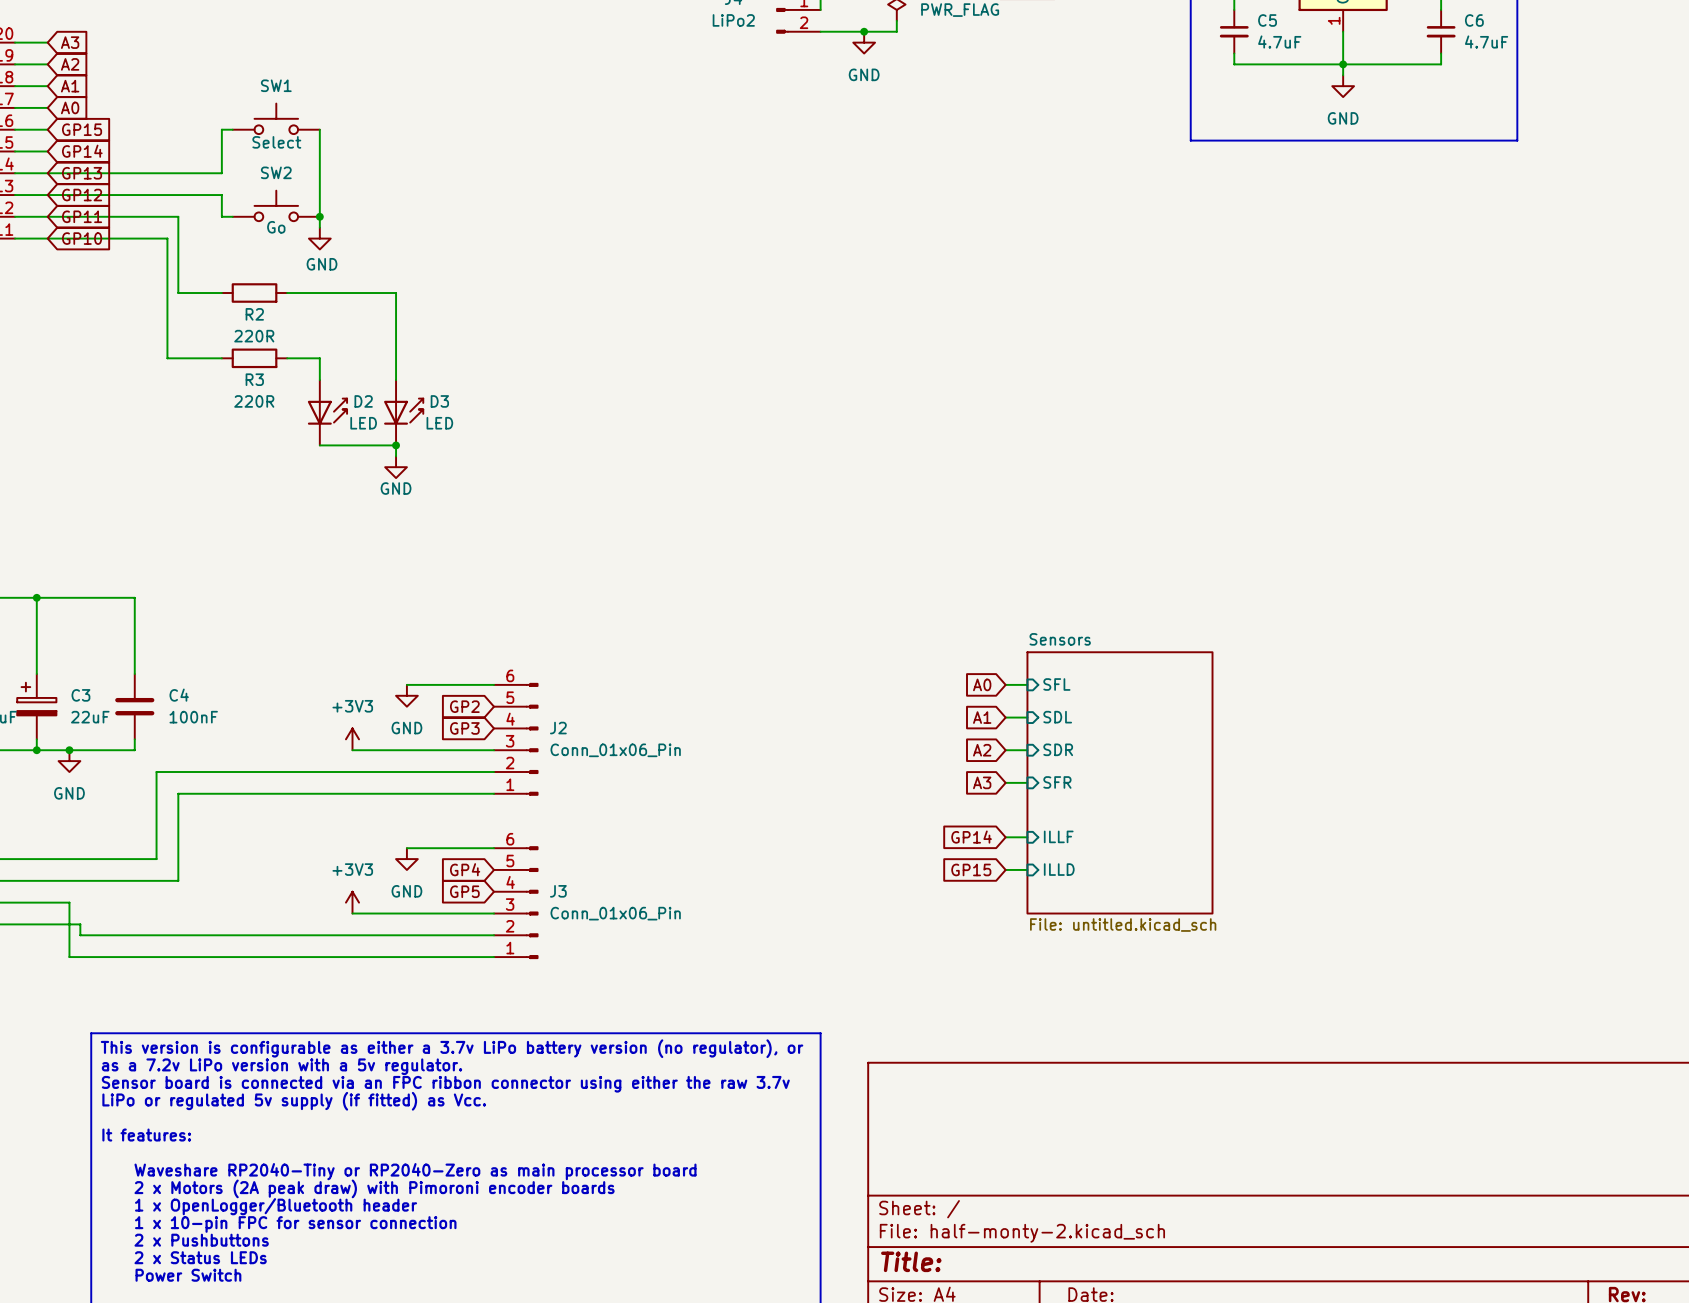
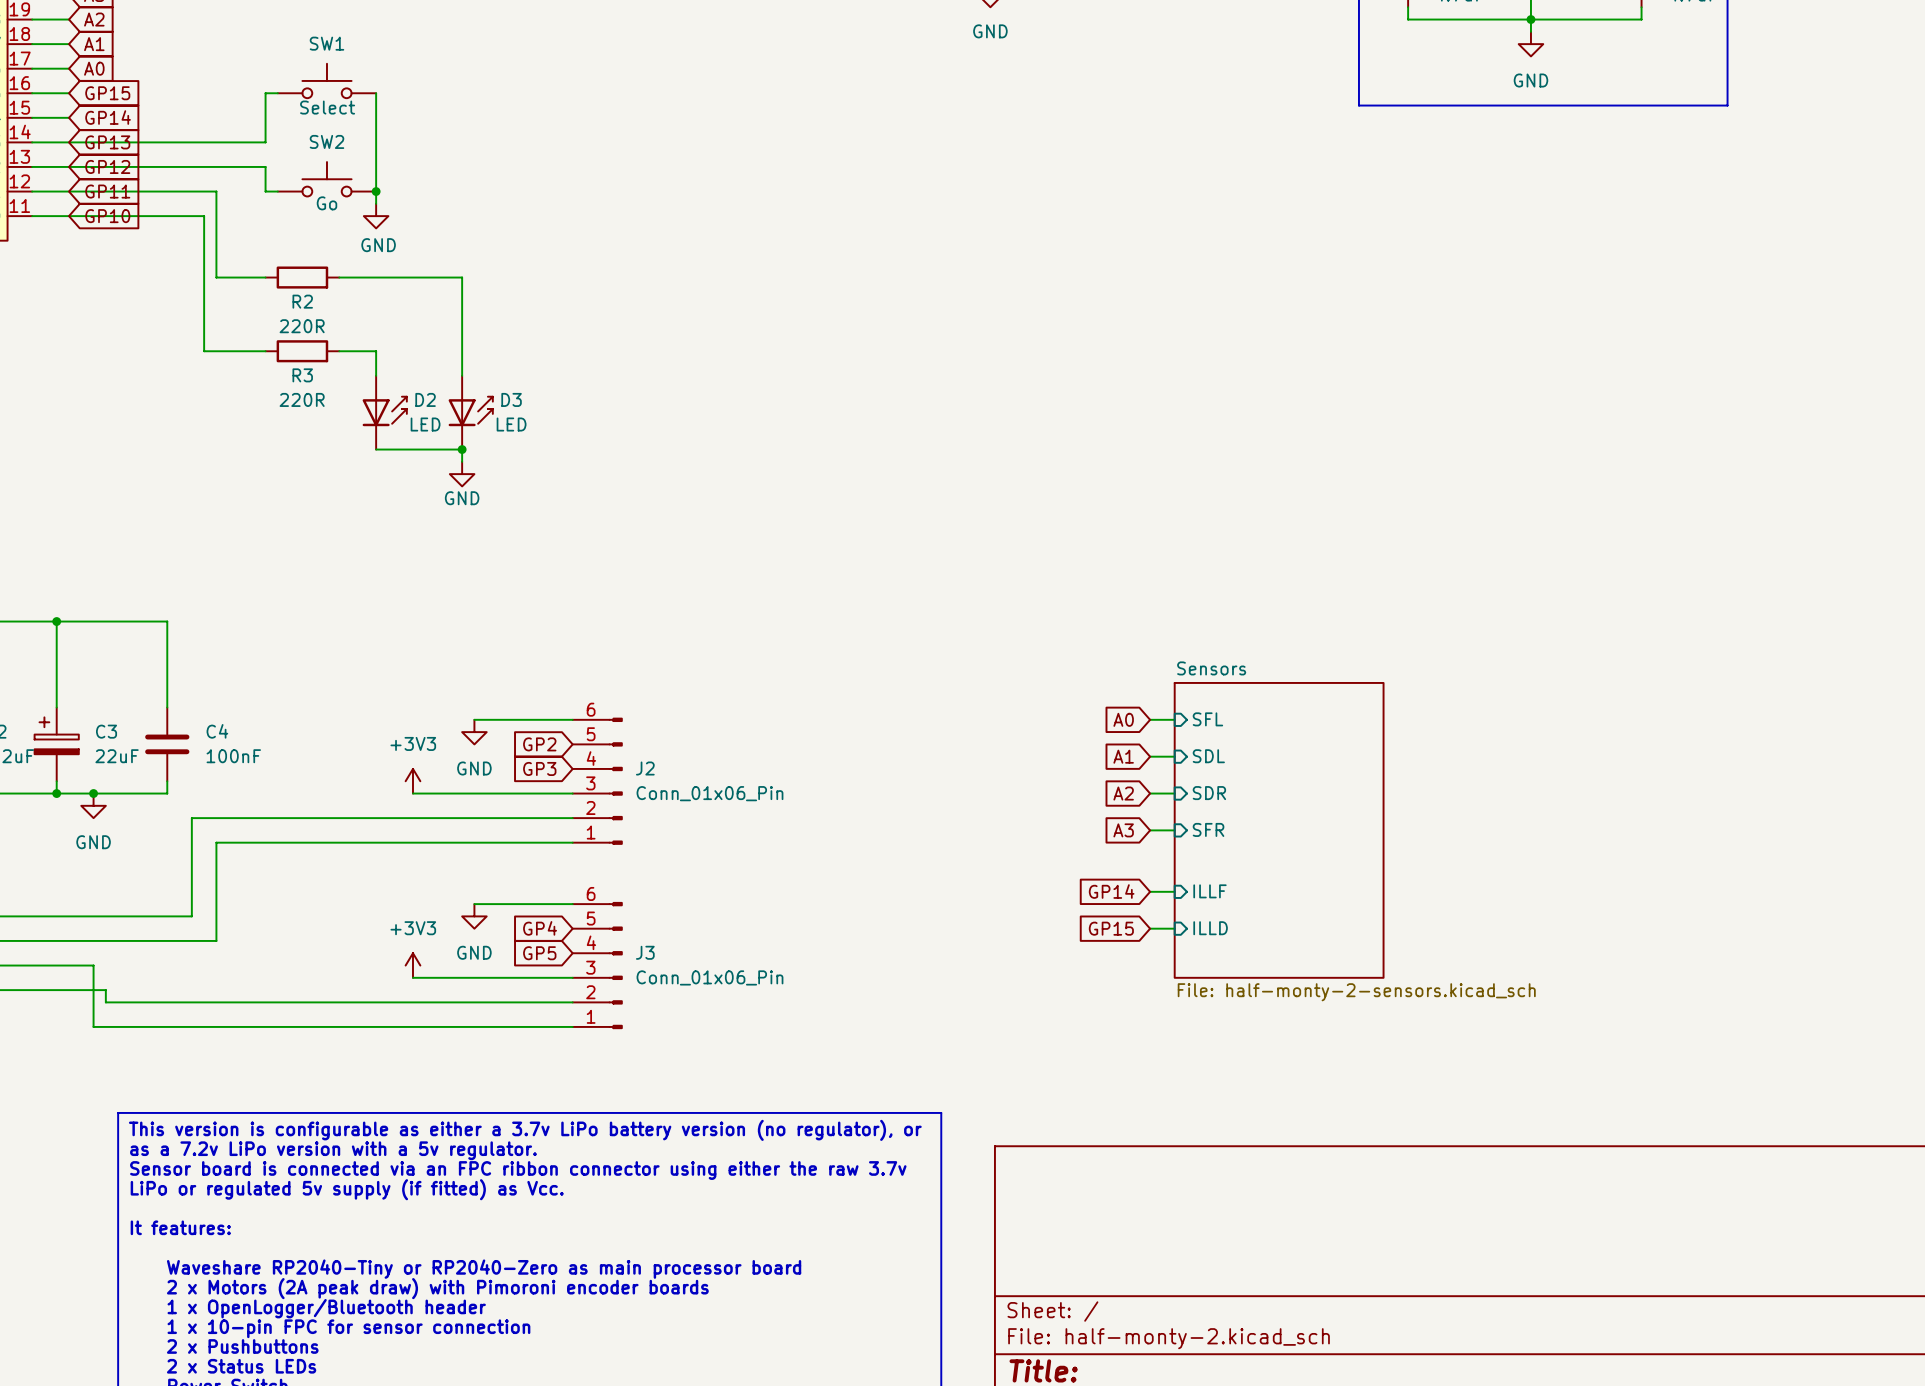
sheet Sensors value: File: untitled.kicad_sch (1123, 925) -> File: half-monty-2-sensors.kicad_sch (1356, 992)

